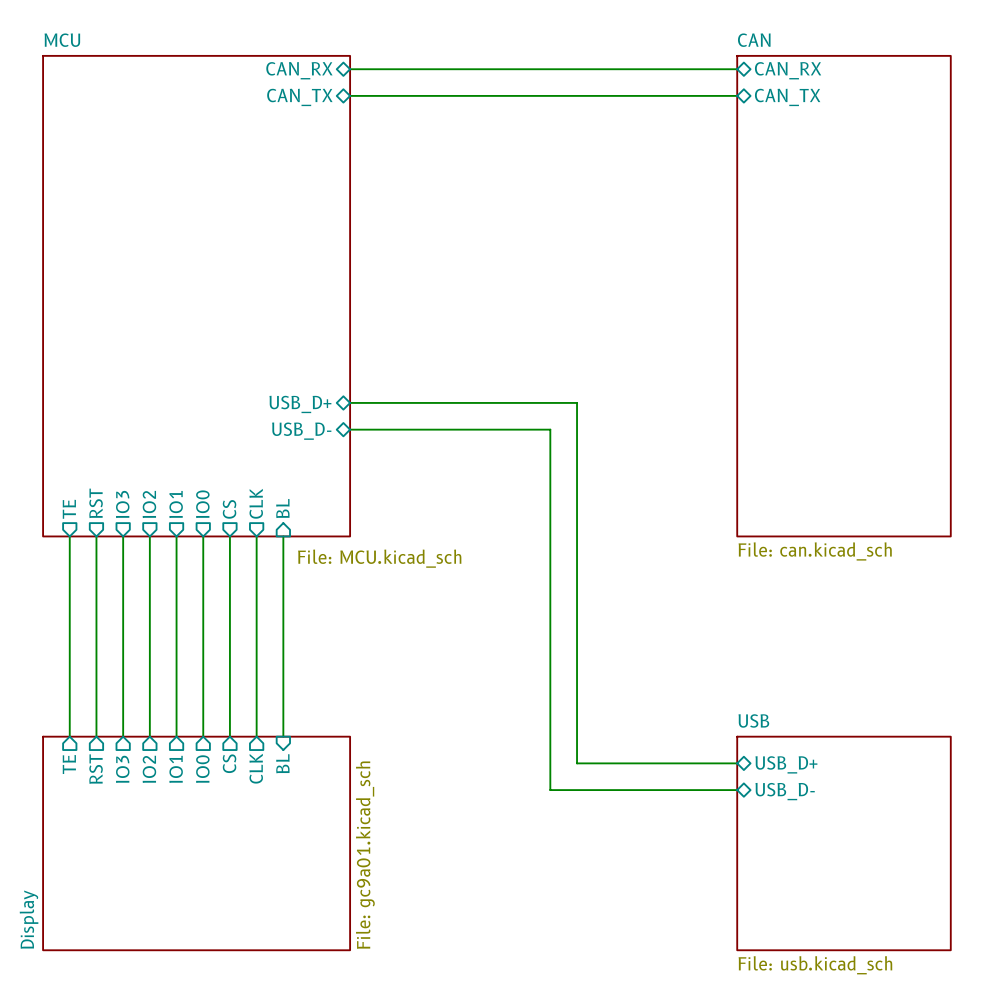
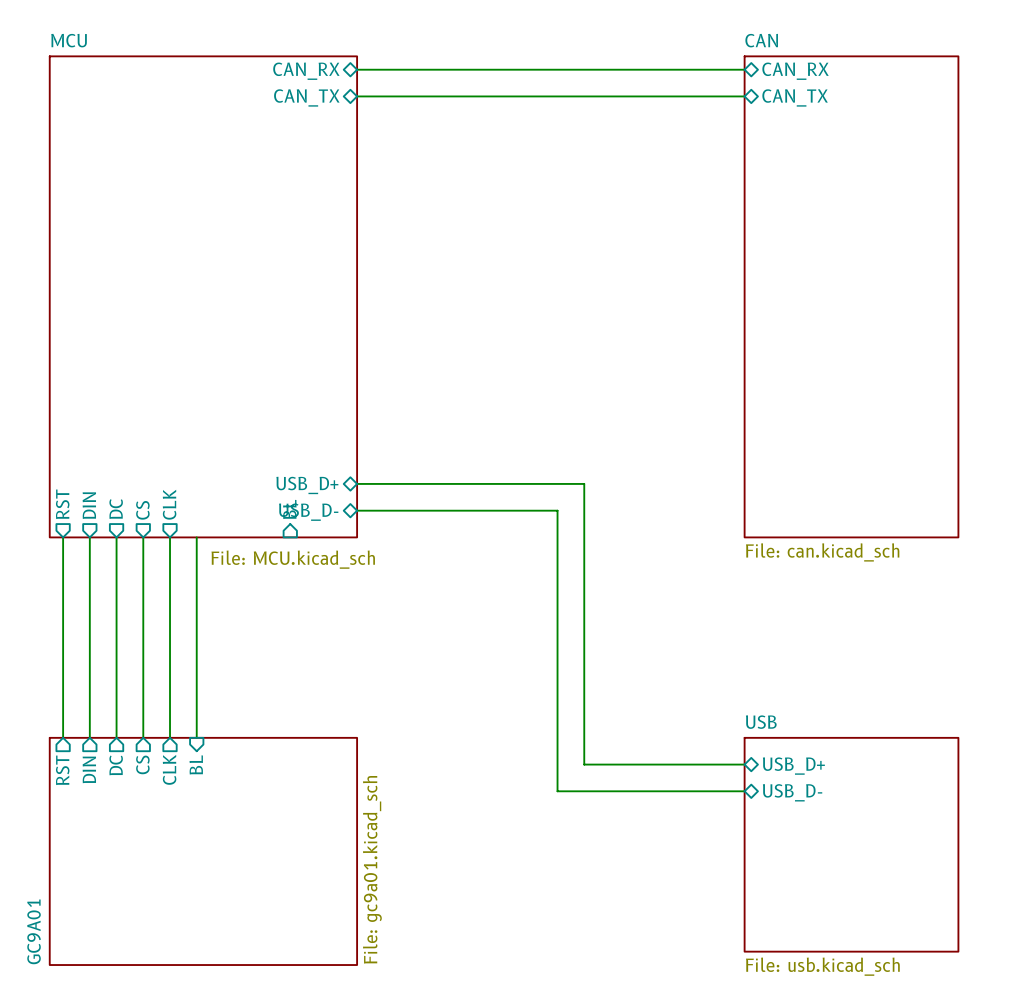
wire: (350, 402) (577, 402) (577, 483) -> (357, 483) (584, 483)
sheet pin position: USB_D+ (300, 404) -> USB_D+ (307, 485)
wire: (350, 429) (550, 429) (550, 509) -> (357, 510) (557, 510)
sheet pin position: USB_D- (301, 431) -> USB_D- (308, 512)
sheet pin position: RST (96, 503) -> RST (62, 504)
sheet pin position: CLK (256, 503) -> CLK (169, 504)
sheet pin: none -> DIN (89, 505)
sheet pin: IO3 (122, 504) -> none
sheet pin: IO2 (149, 504) -> none
sheet pin: IO1 (176, 504) -> none
sheet pin: IO0 (202, 504) -> none
sheet pin: none -> DC (116, 509)
sheet pin: TE (69, 509) -> none
sheet pin position: CS (229, 509) -> CS (142, 510)
wire: (69, 536) (69, 736) -> (63, 537) (63, 737)
wire: (96, 536) (96, 736) -> (89, 537) (89, 737)
wire: (123, 536) (123, 736) -> (116, 537) (116, 737)
wire: (149, 536) (149, 736) -> (143, 537) (143, 737)
wire: (176, 536) (176, 736) -> (170, 537) (170, 737)
wire: (203, 536) (203, 736) -> (196, 537) (196, 737)
wire: (229, 536) (229, 736) -> none
wire: (256, 536) (256, 736) -> none
wire: (283, 536) (283, 736) -> none
sheet MCU value position: File: MCU.kicad_sch (379, 558) -> File: MCU.kicad_sch (293, 559)
sheet pin position: CS (229, 763) -> CS (142, 764)
sheet pin position: BL (282, 763) -> BL (196, 764)
sheet pin: TE (69, 764) -> none
sheet pin: none -> DC (116, 765)
sheet pin: none -> DIN (89, 769)
sheet pin position: CLK (256, 768) -> CLK (169, 769)
sheet pin position: RST (96, 769) -> RST (62, 770)
sheet pin: IO3 (122, 769) -> none
sheet pin: IO2 (149, 769) -> none
sheet pin: IO1 (176, 769) -> none
sheet pin: IO0 (202, 769) -> none
sheet Display: File: gc9a01.kicad_sch (196, 843) -> none
sheet GC9A01: none -> File: gc9a01.kicad_sch (203, 851)

